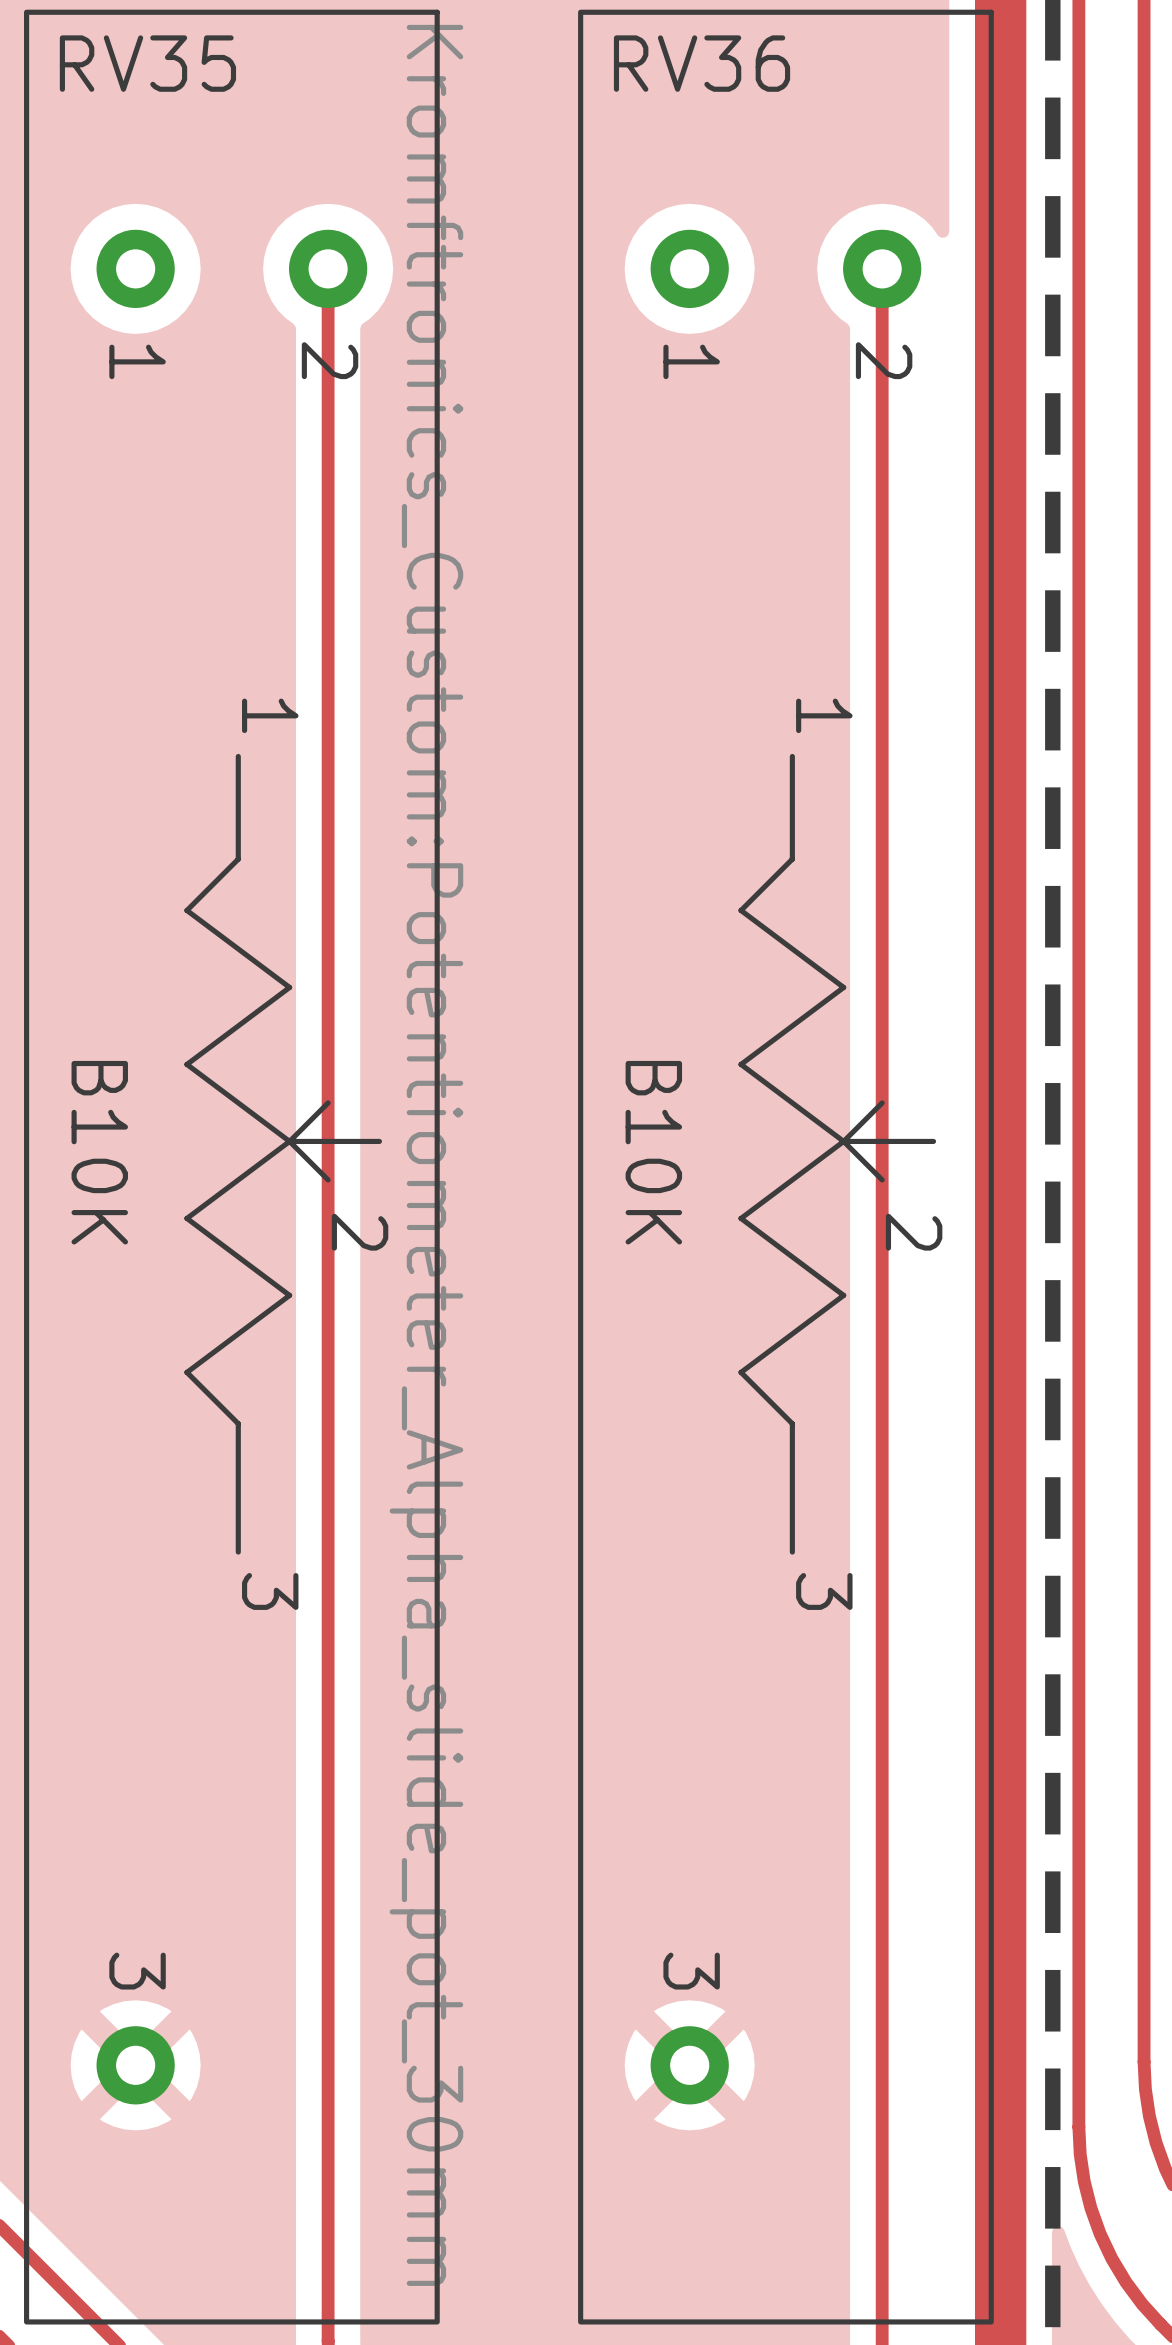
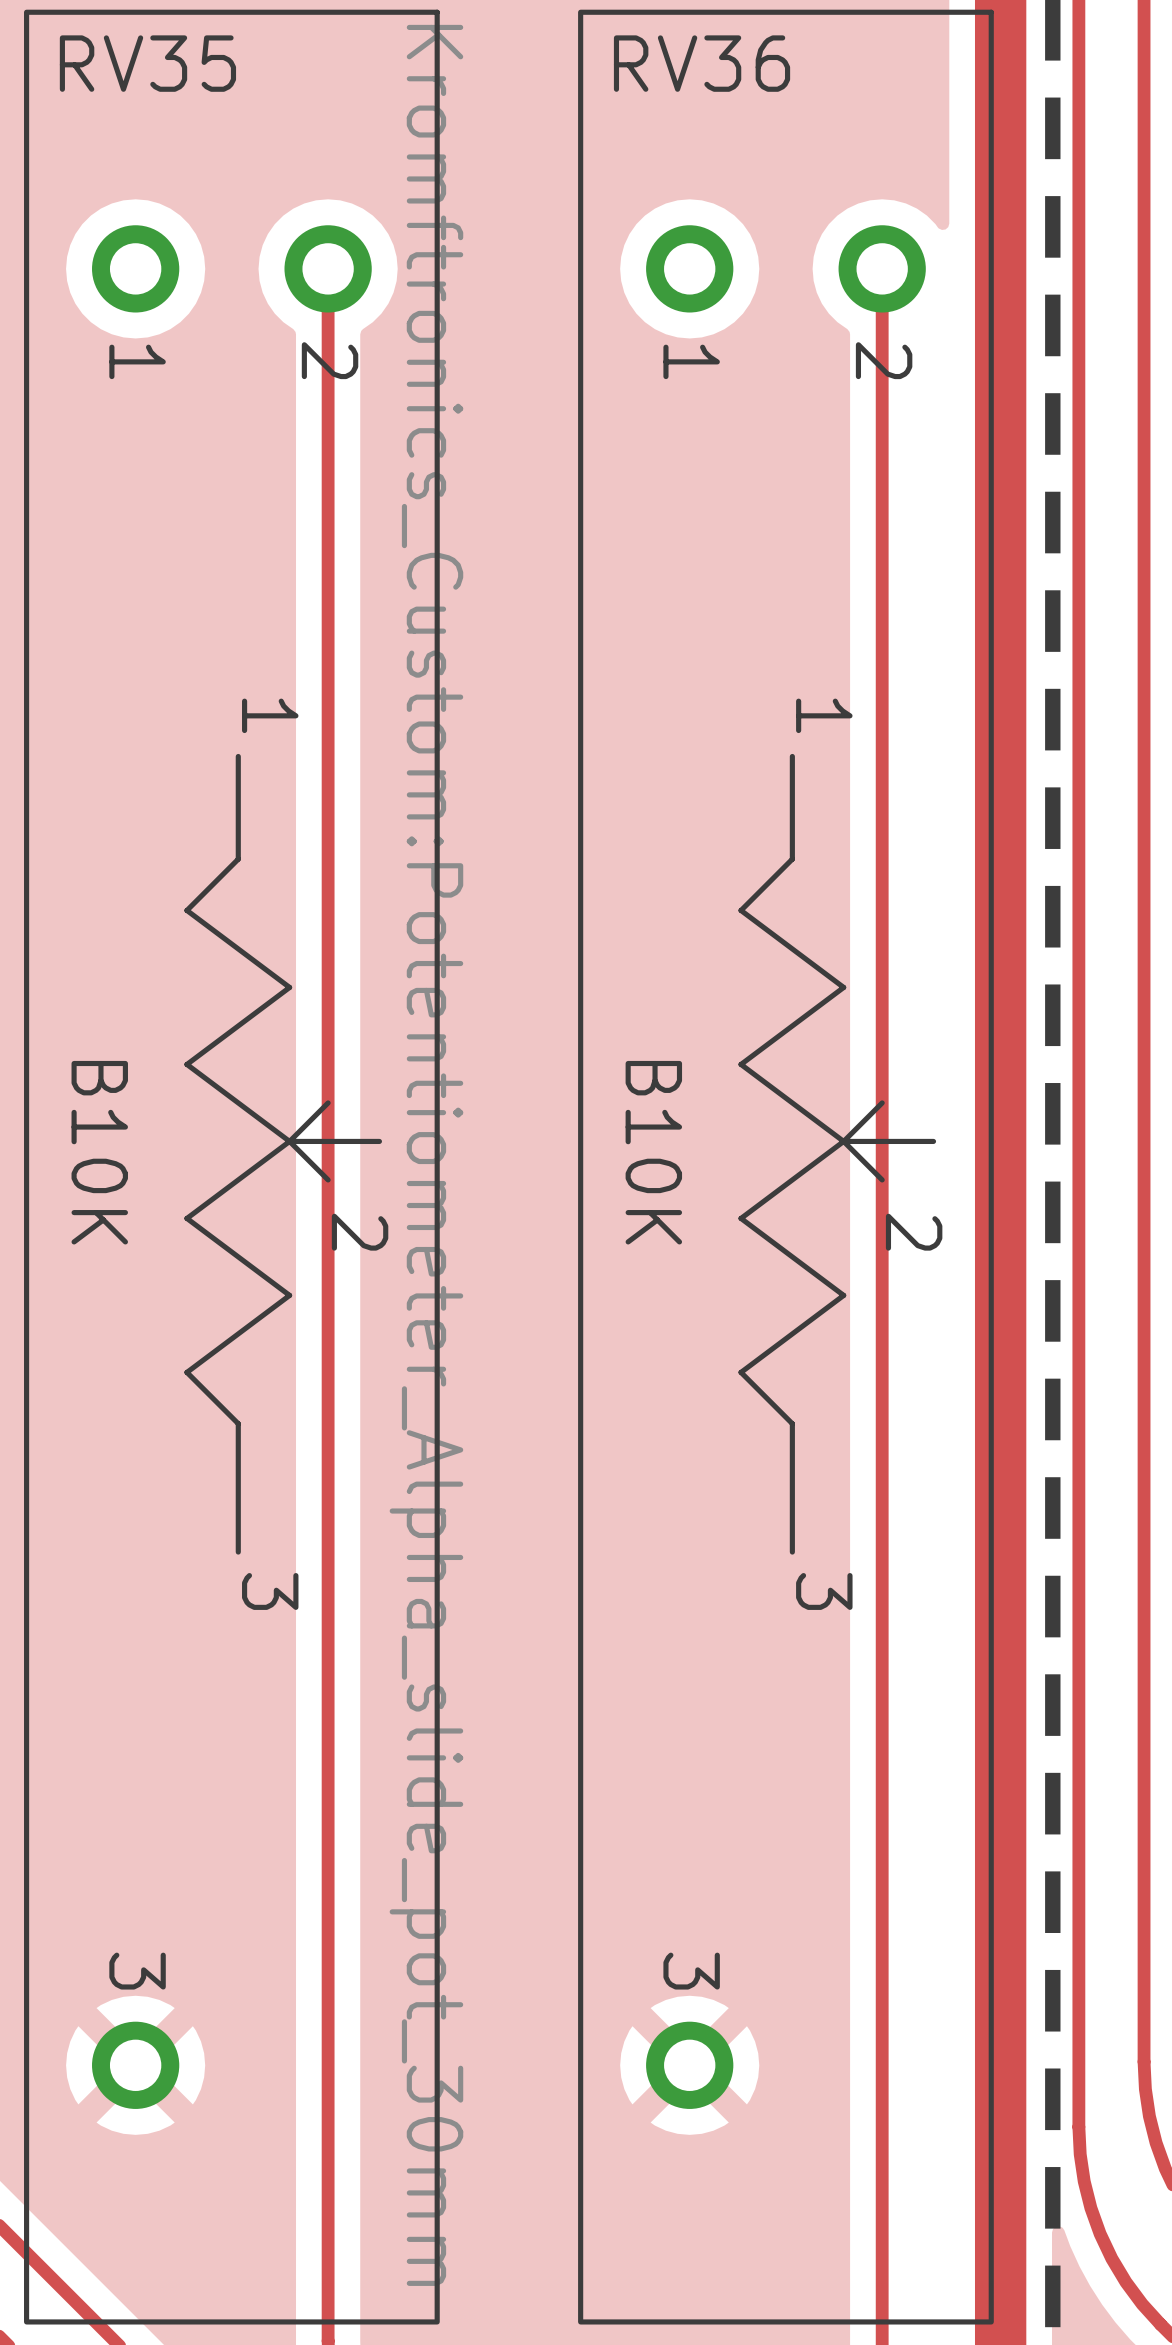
RV35 footprint: [24, 9, 440, 2325] -> [24, 9, 440, 2325]
RV36 footprint: [578, 9, 994, 2325] -> [578, 9, 994, 2325]

